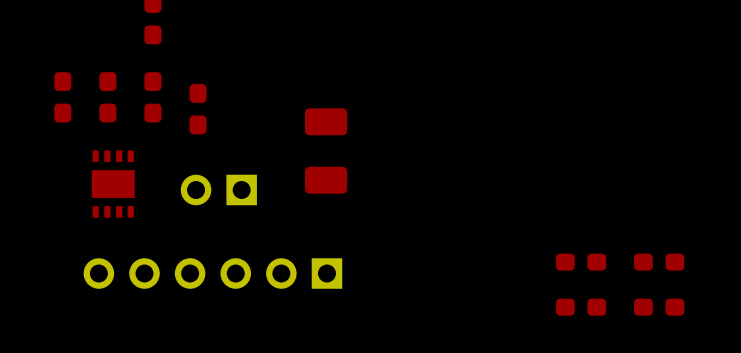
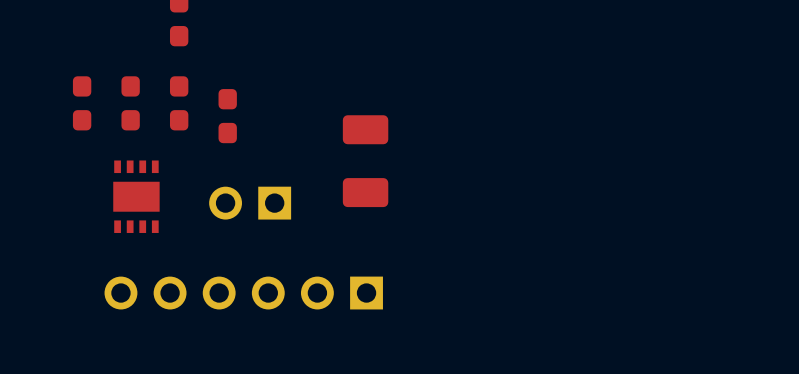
part: (581, 262) -> none
part: (659, 262) -> none
part: (581, 307) -> none
part: (659, 307) -> none

